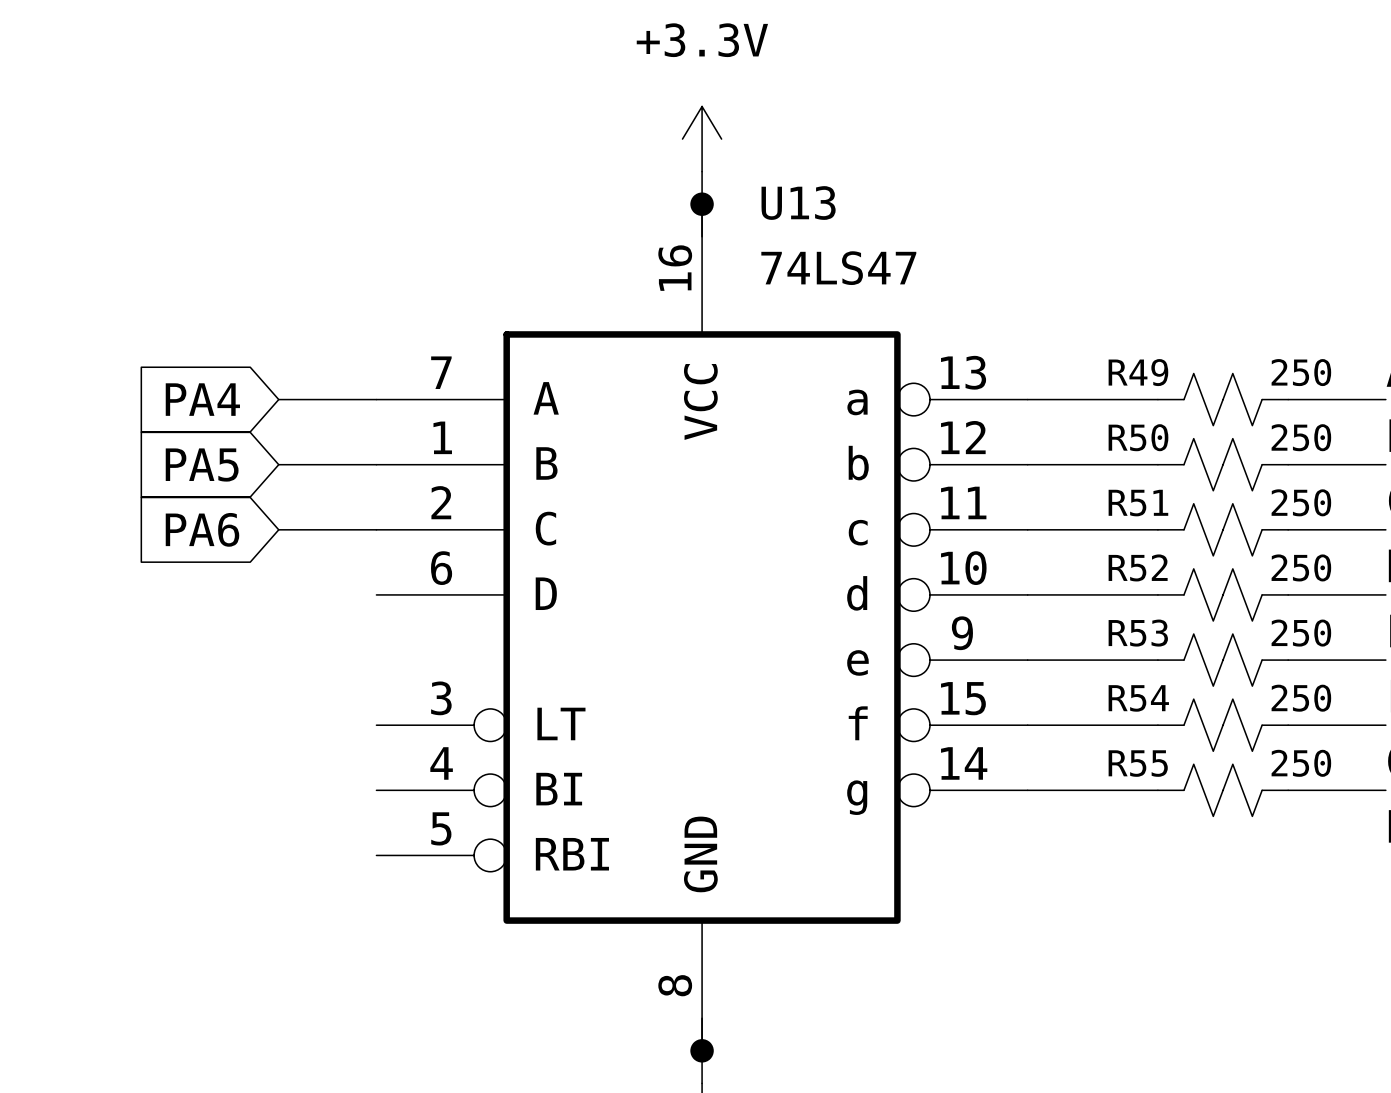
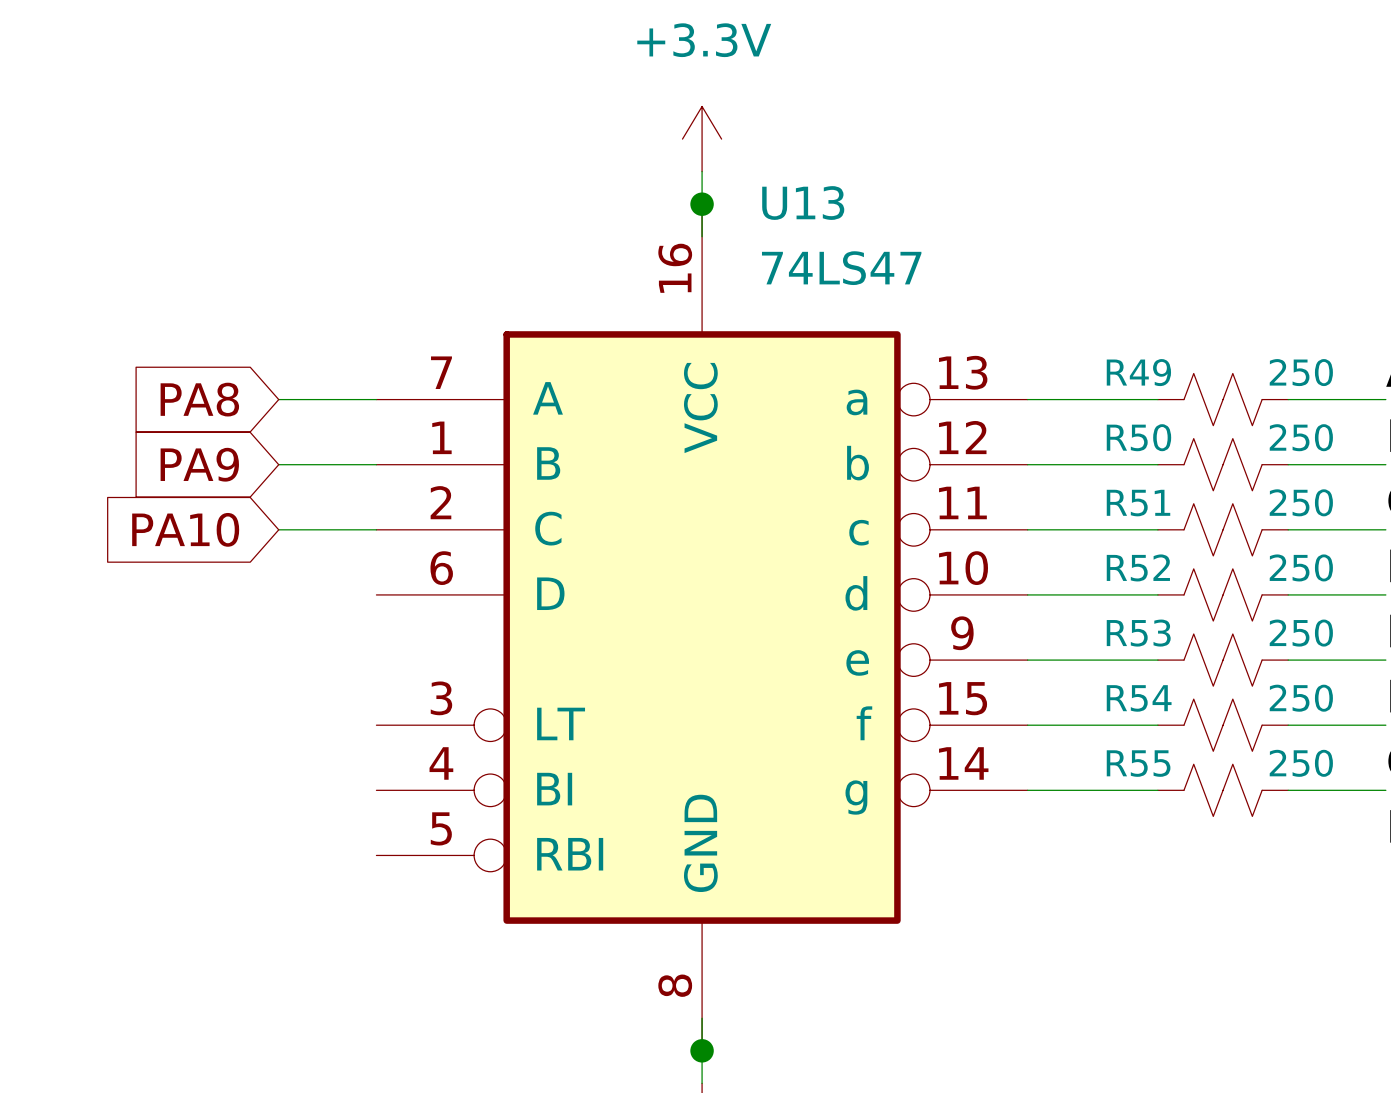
global label: PA4 (202, 399) -> PA8 (199, 399)
global label: PA5 (202, 465) -> PA9 (199, 464)
global label: PA6 (202, 529) -> PA10 (185, 529)

